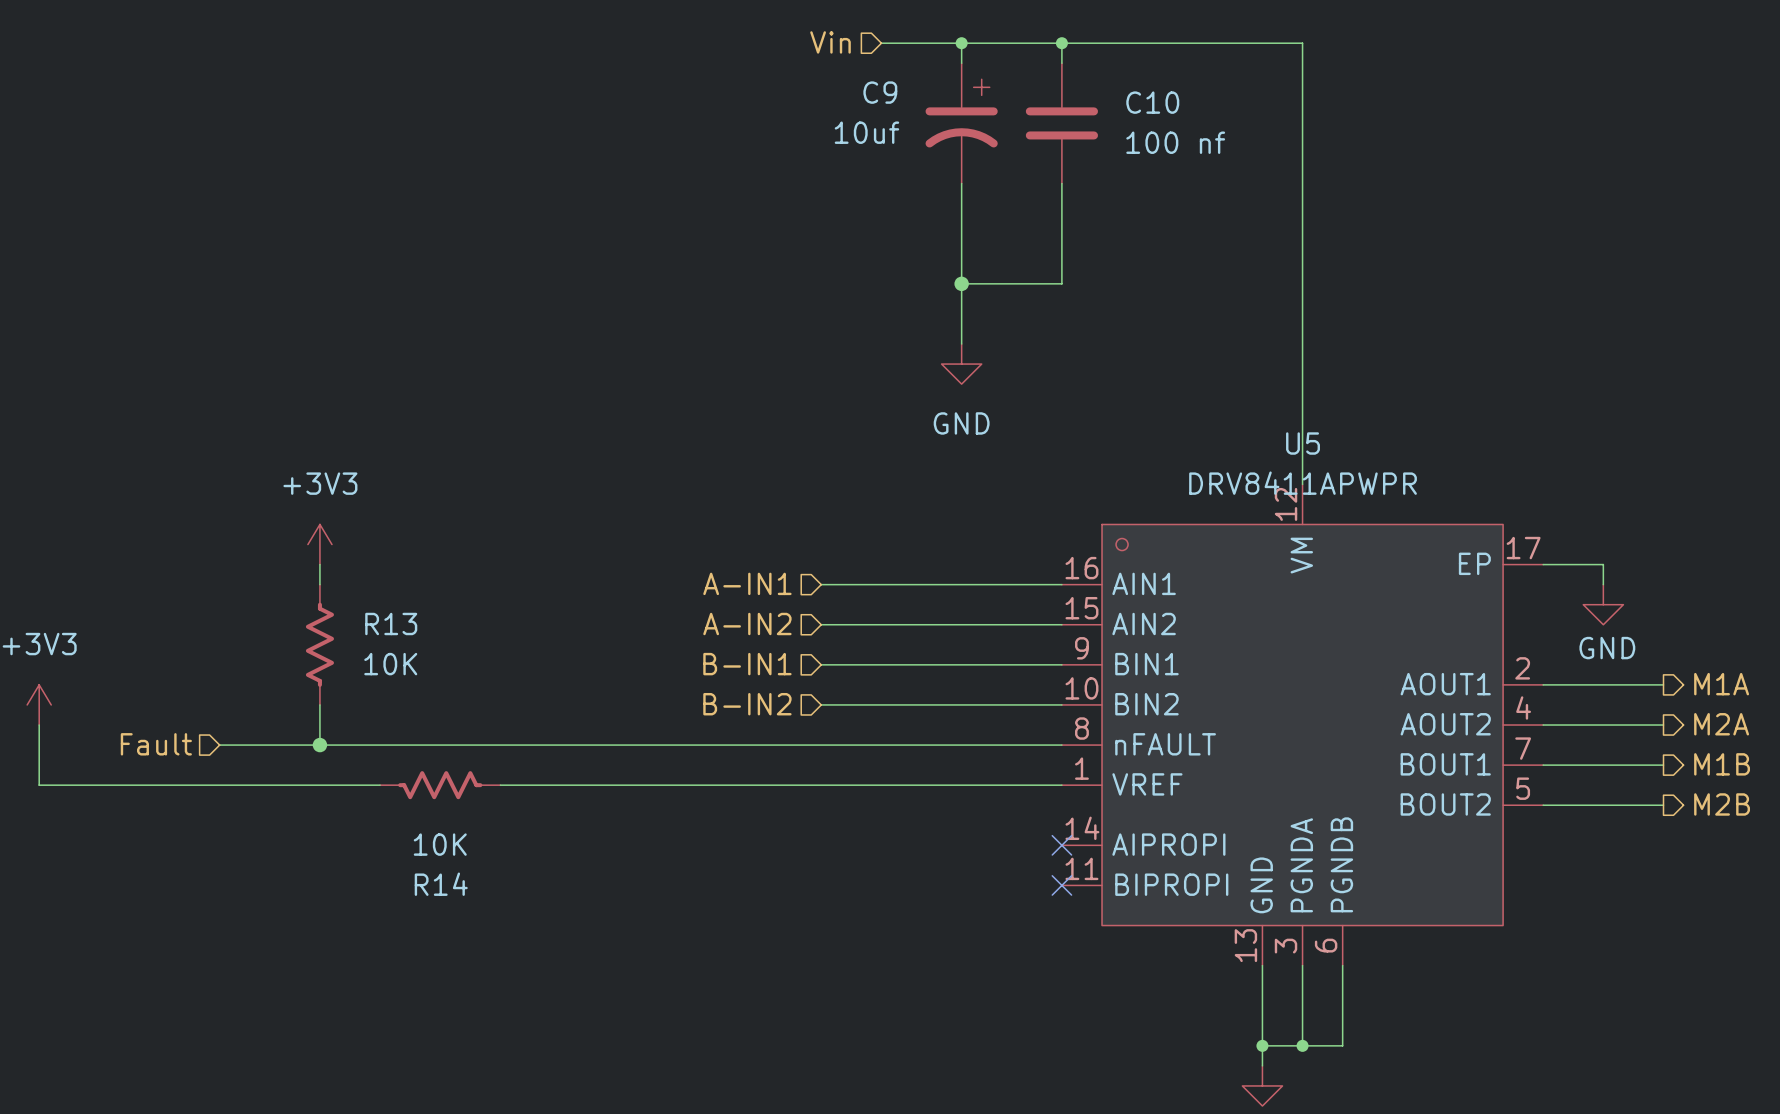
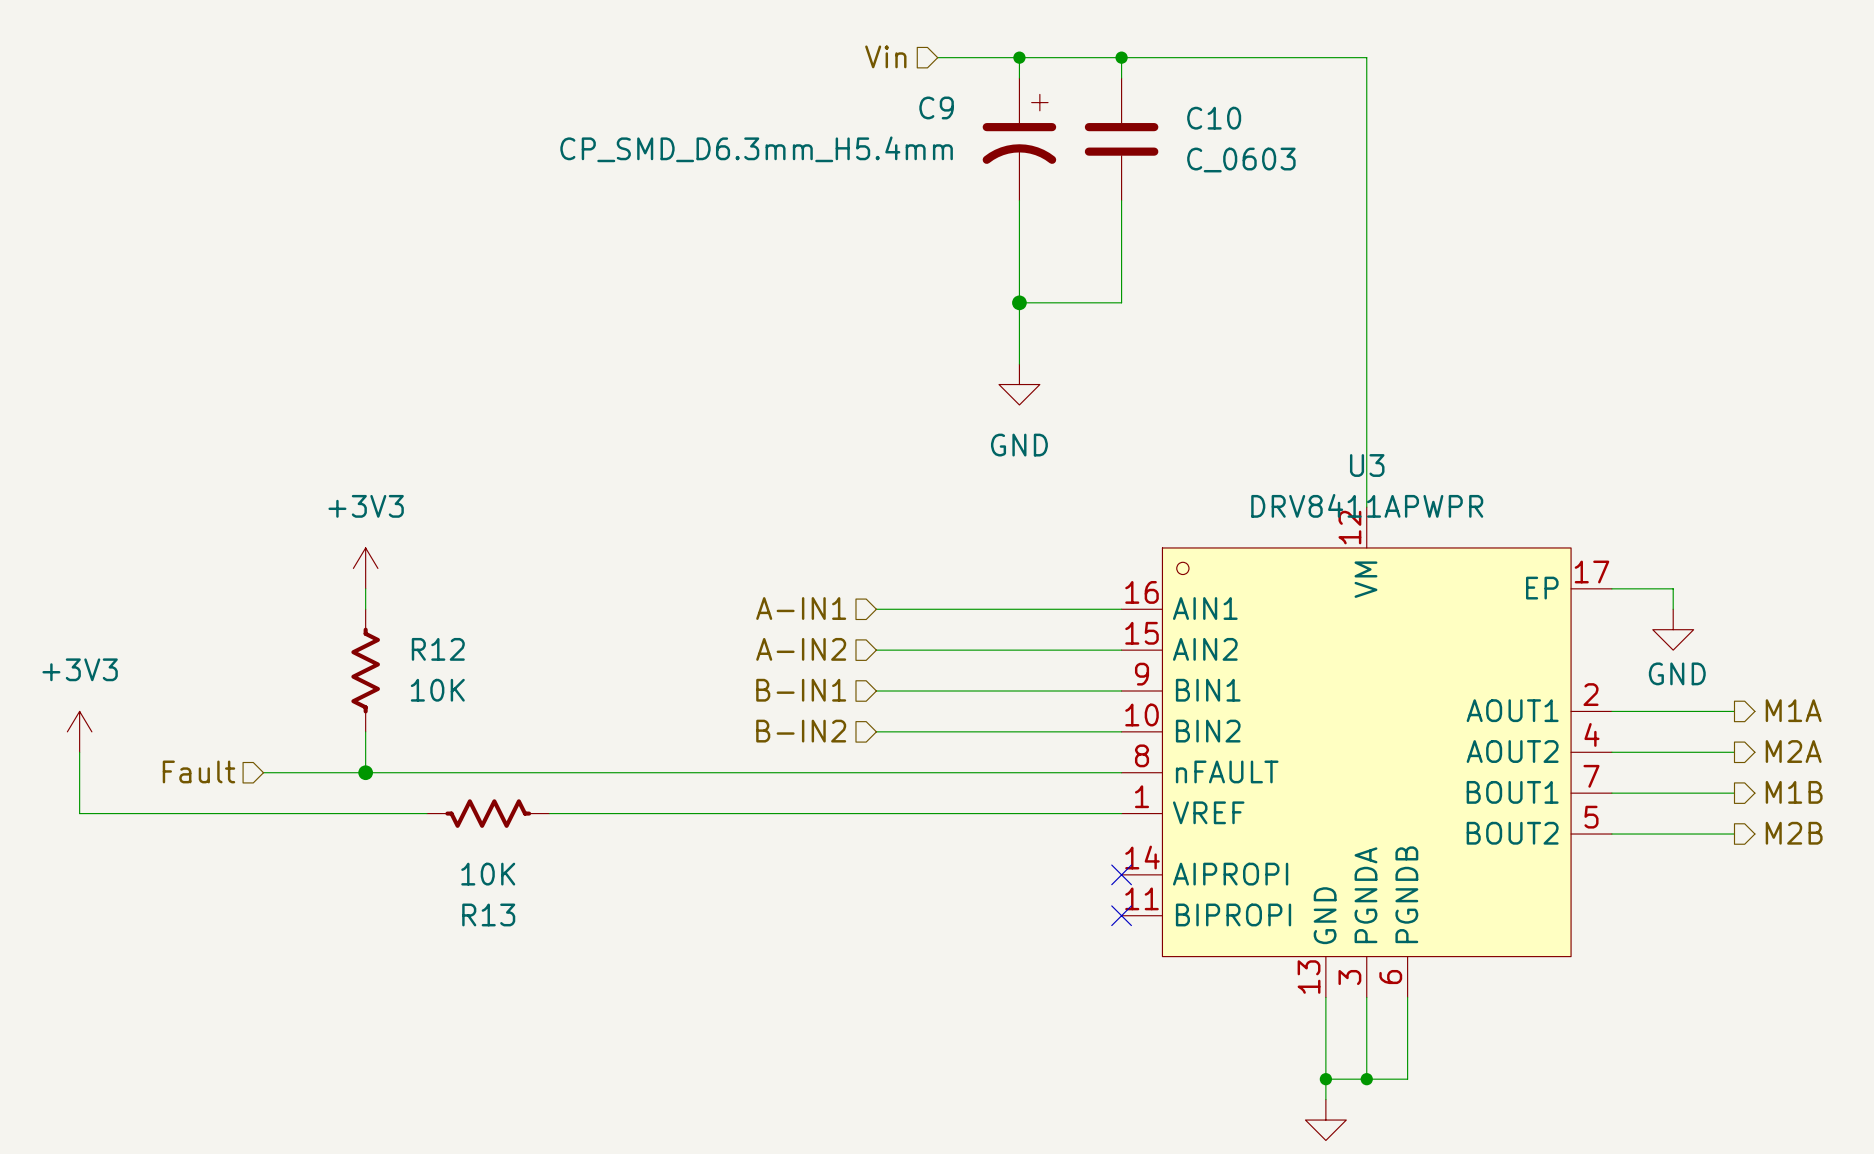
C9 value: 10uf (866, 132) -> CP_SMD_D6.3mm_H5.4mm (756, 149)
C10 value: 100 nf (1175, 142) -> C_0603 (1241, 160)
U5 name: U5 (1303, 443) -> U3 (1367, 465)
R13 name: R13 (391, 623) -> R12 (438, 649)
R14 name: R14 (441, 884) -> R13 (488, 914)

